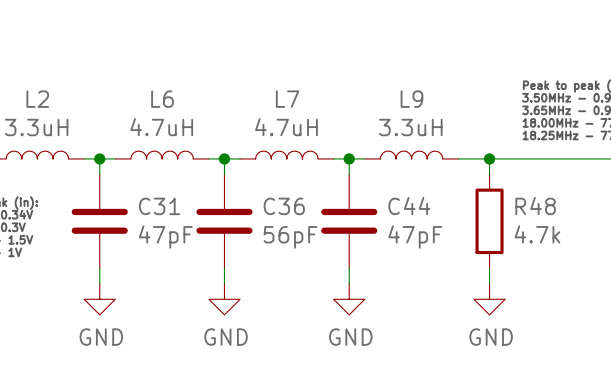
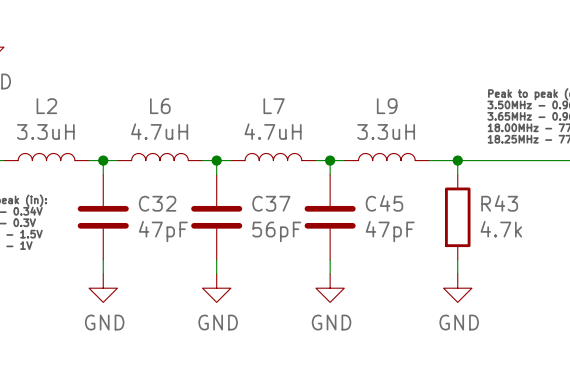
C31 name: C31 (159, 206) -> C32 (157, 203)
C36 name: C36 (284, 206) -> C37 (271, 203)
C44 name: C44 (409, 206) -> C45 (384, 203)
R48 name: R48 (535, 206) -> R43 (499, 203)

